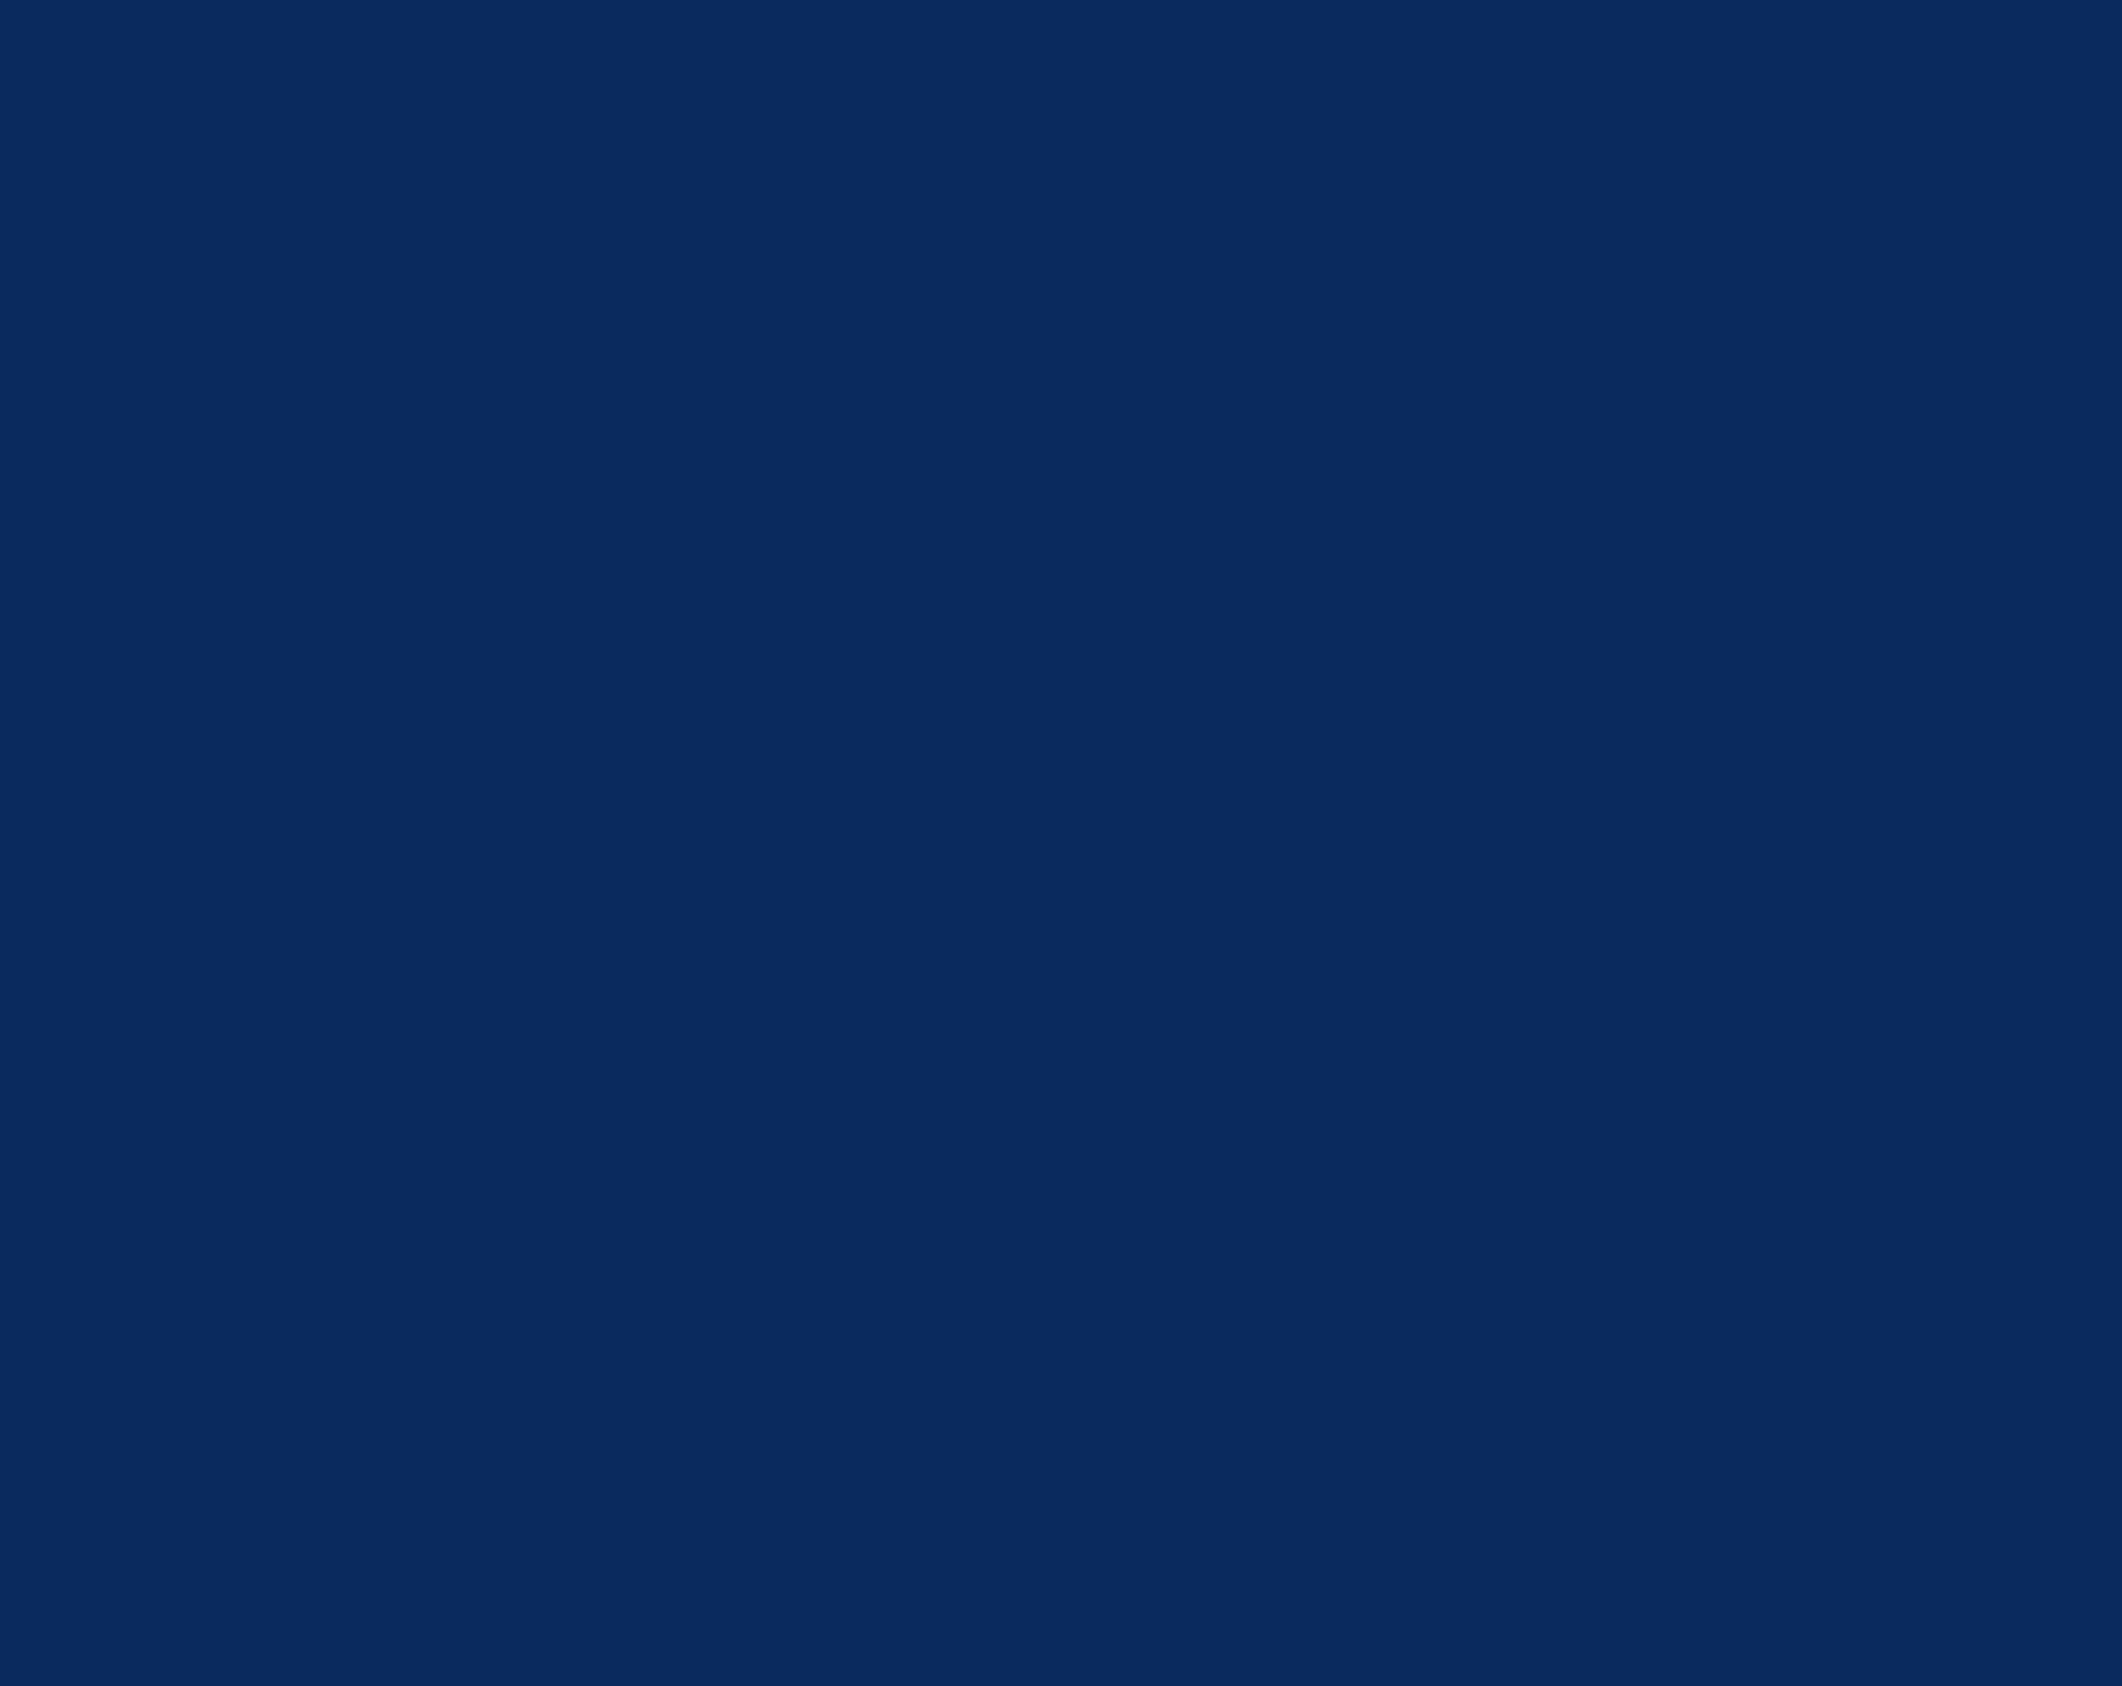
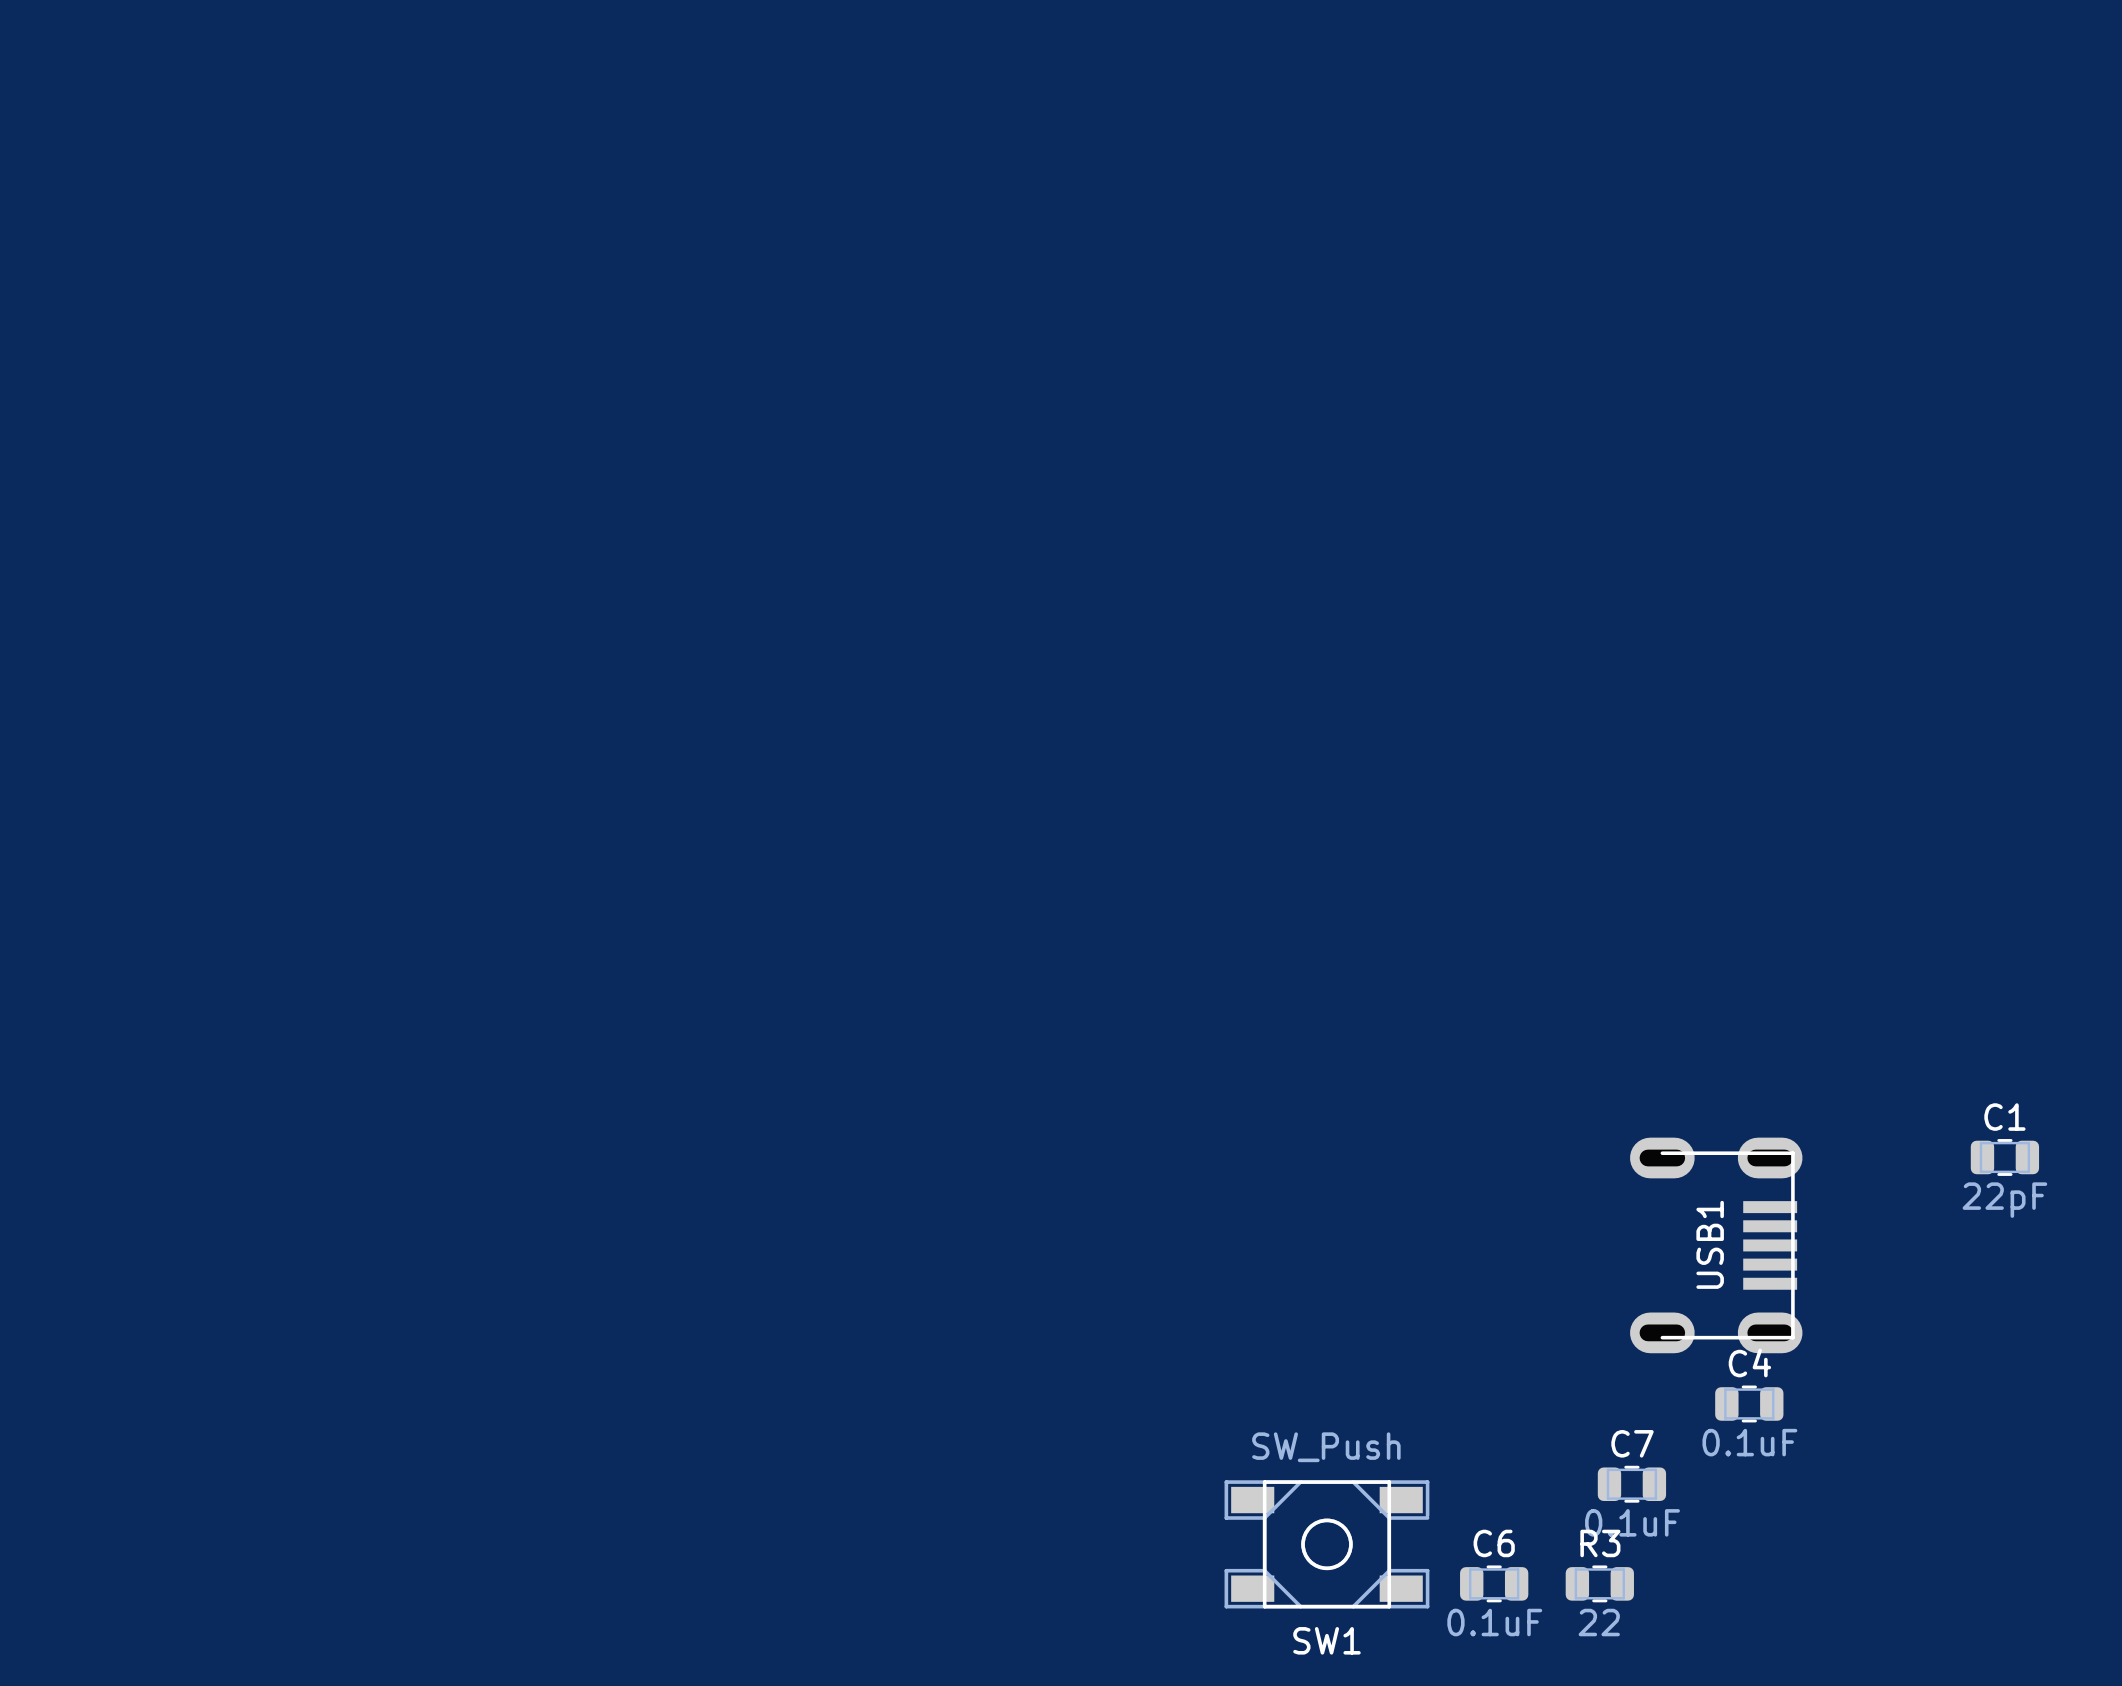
C1: none -> 22pF (2004, 1157)
USB1: none -> (1716, 1245)
C4: none -> 0.1uF (1749, 1403)
C7: none -> 0.1uF (1631, 1484)
SW1: none -> SW_Push (1326, 1544)
C6: none -> 0.1uF (1494, 1583)
R3: none -> 22 (1599, 1583)

